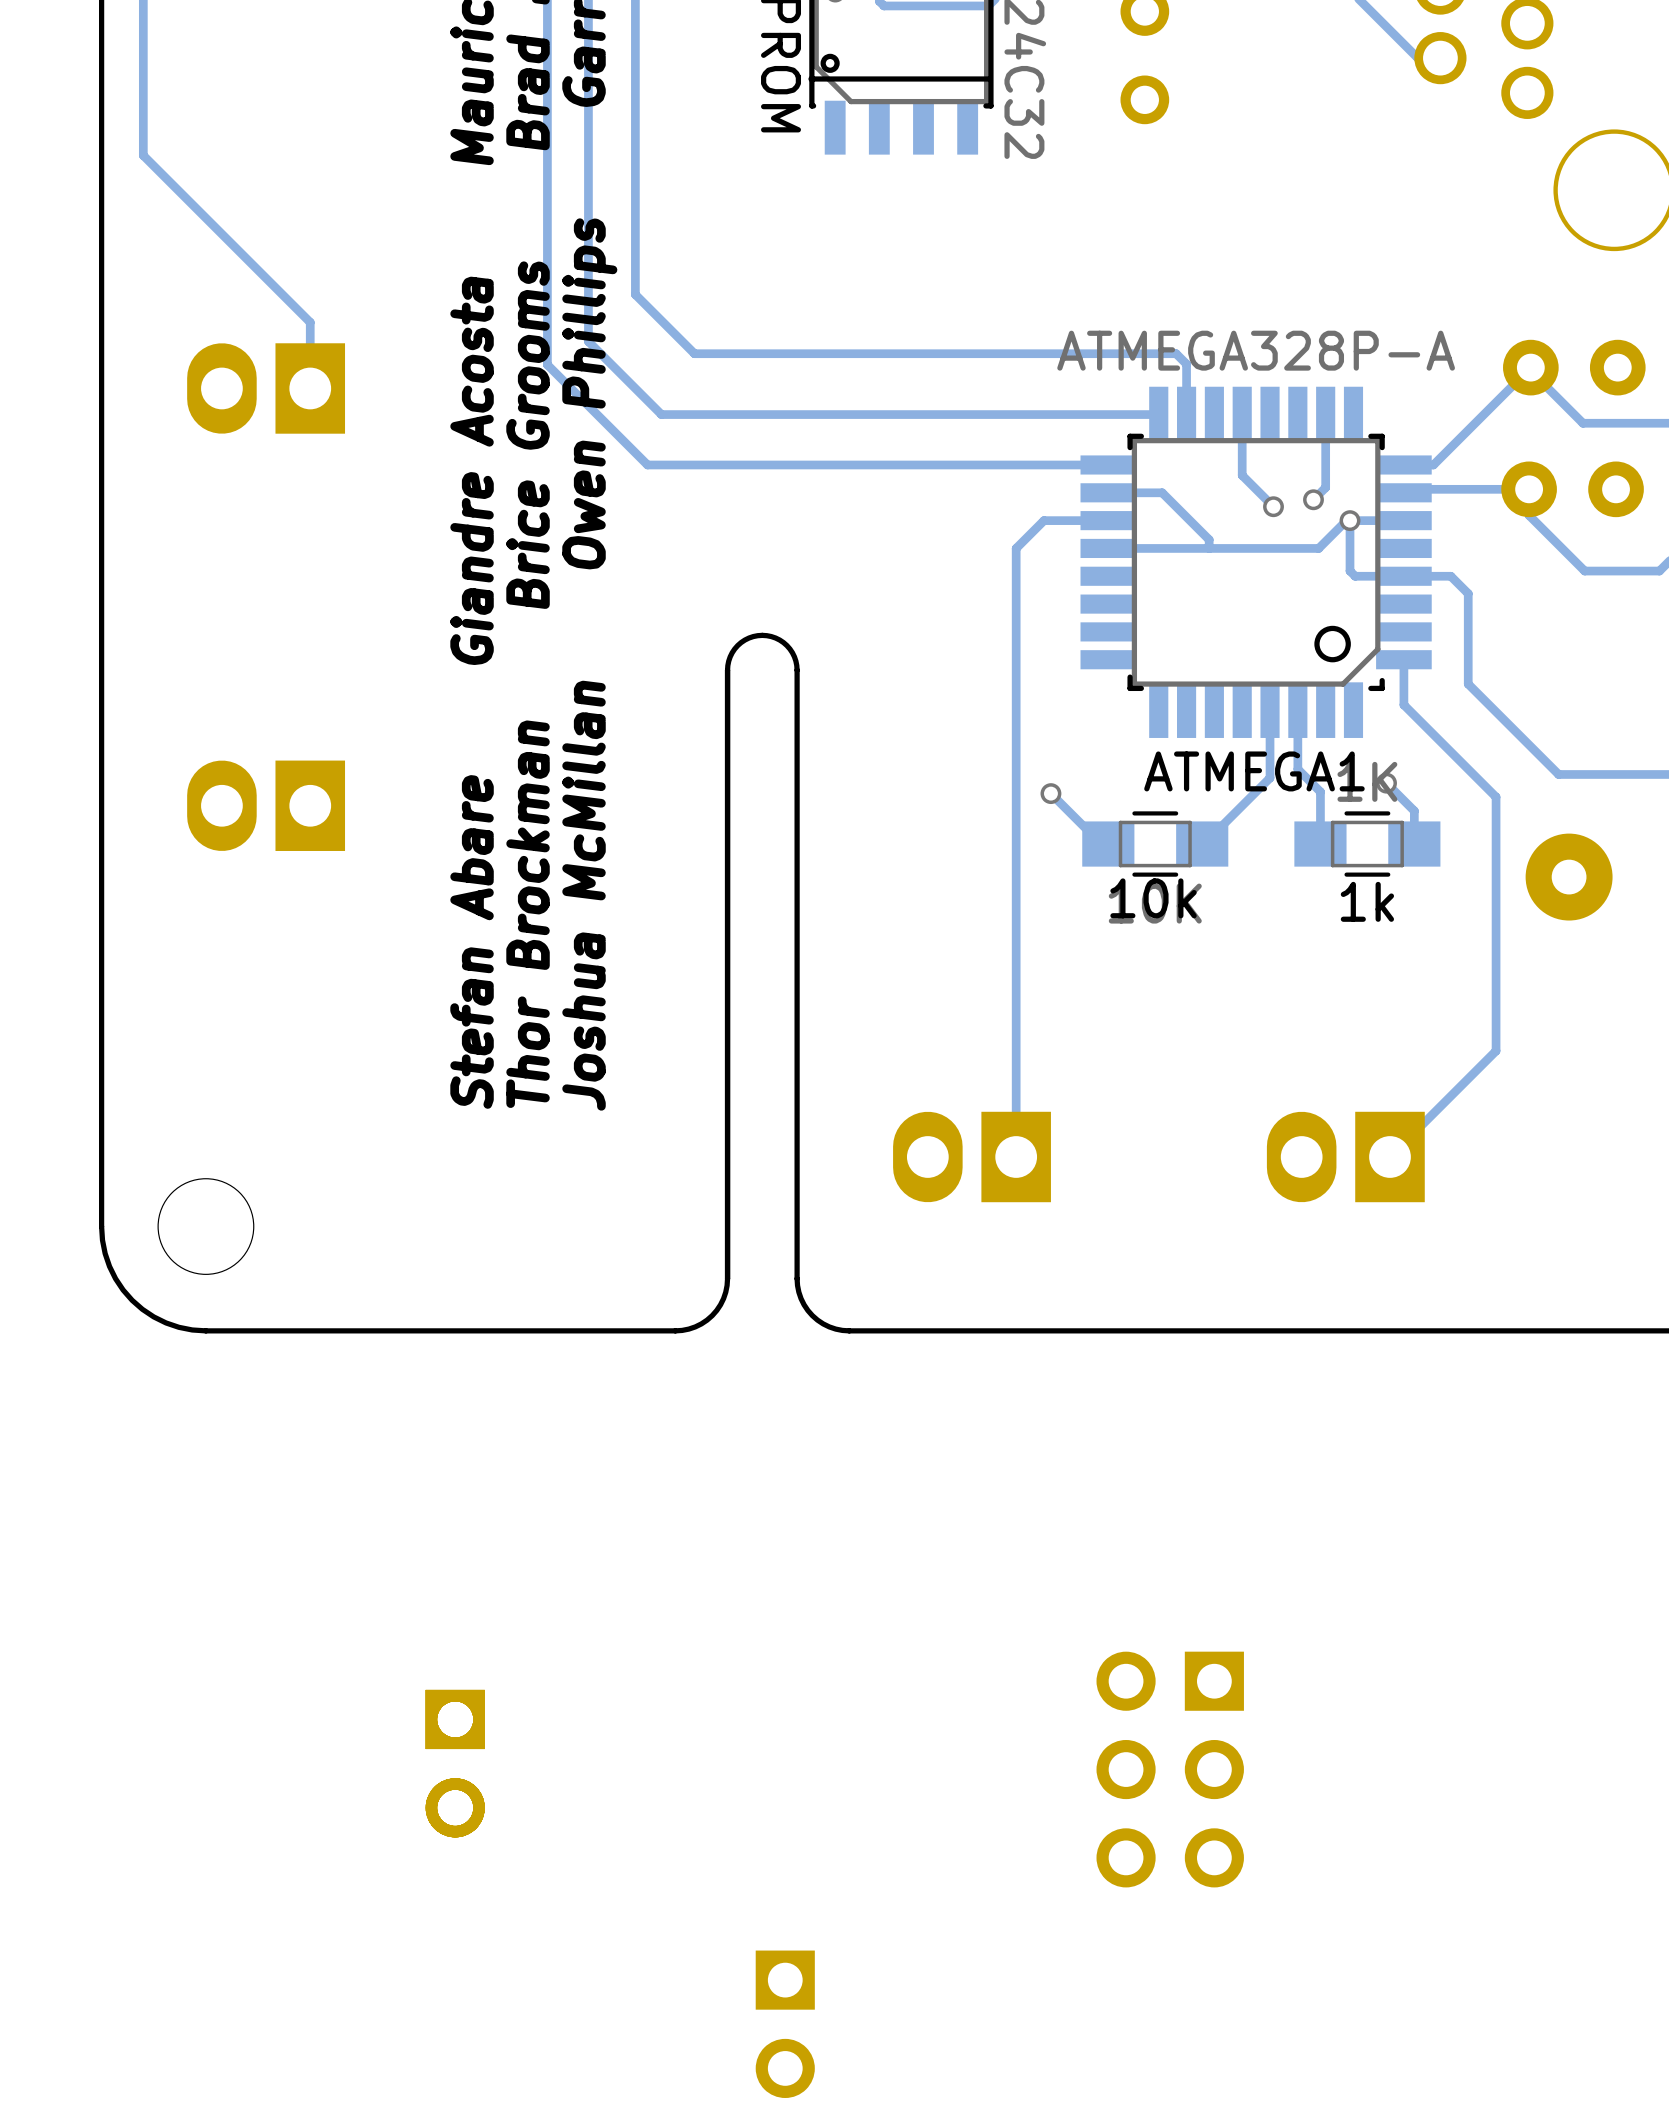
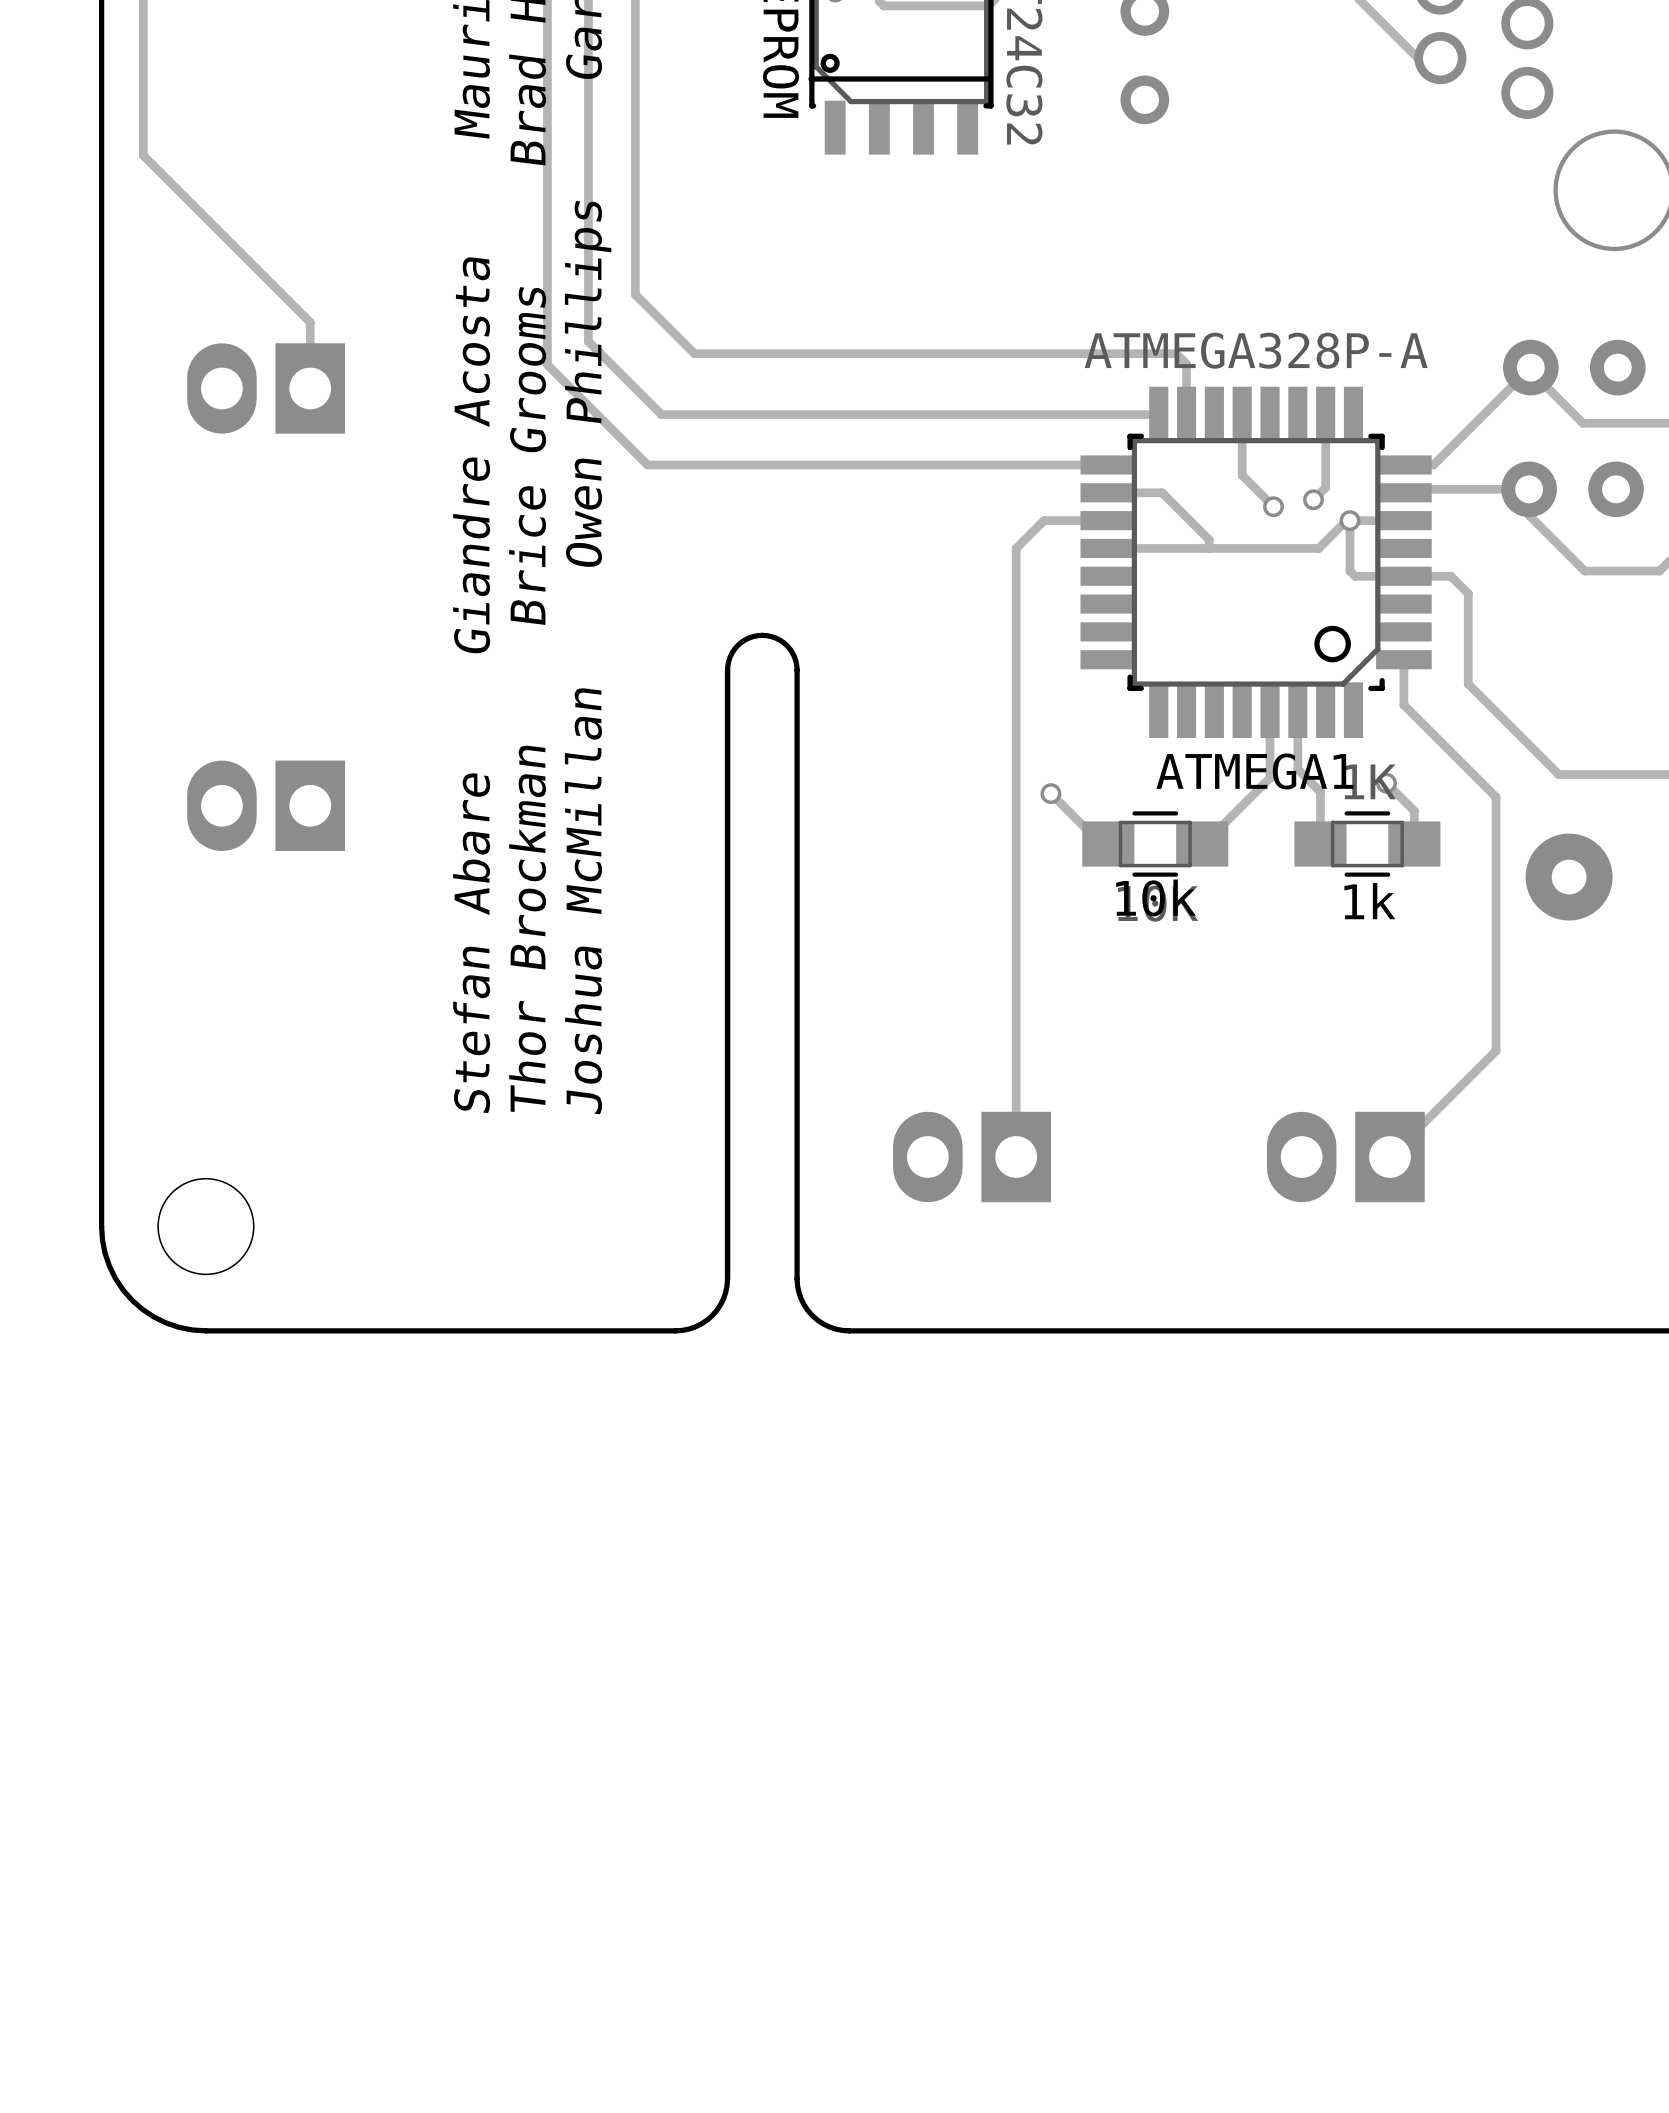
part: (455, 1763) -> none
part: (1170, 1769) -> none
part: (785, 2024) -> none

